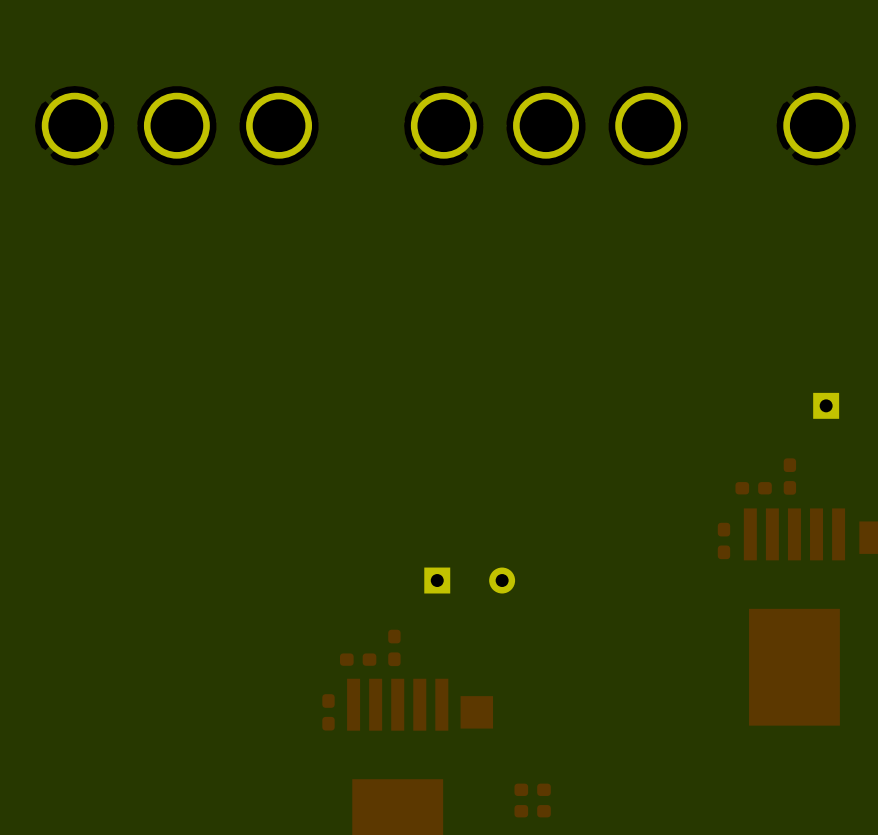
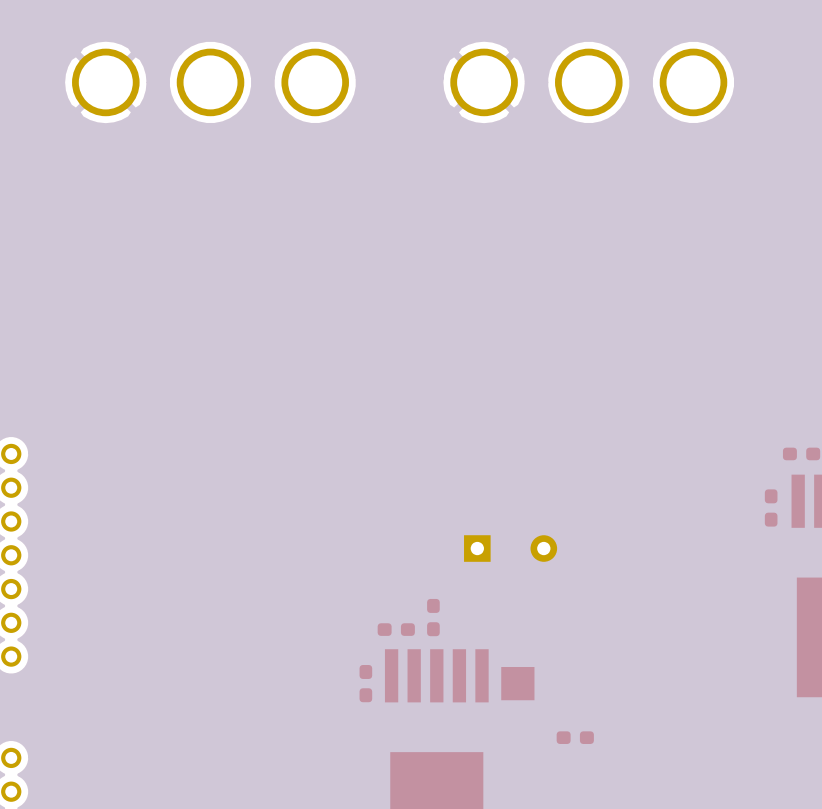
part: none -> (575, 737)
part: (532, 789) -> none
part: (532, 811) -> none

